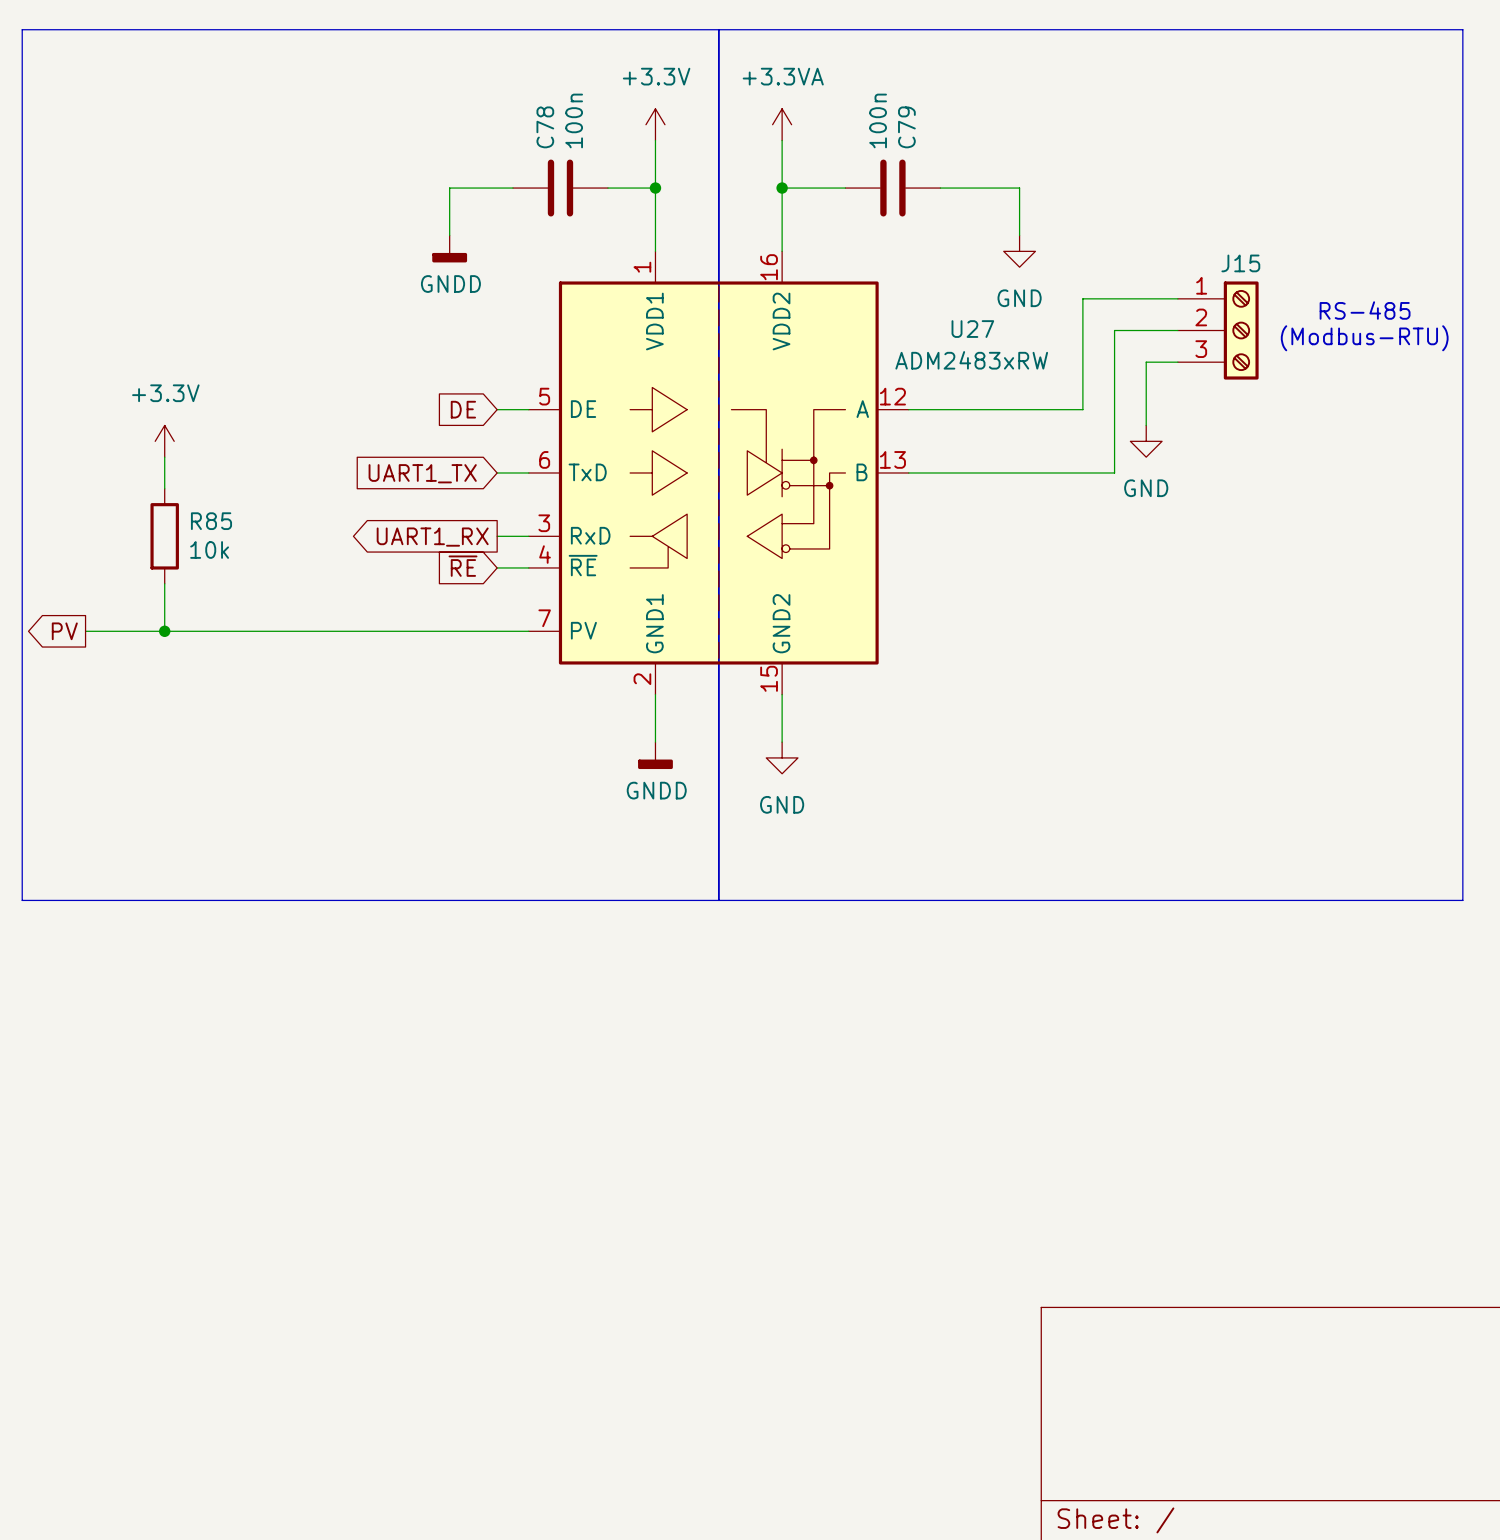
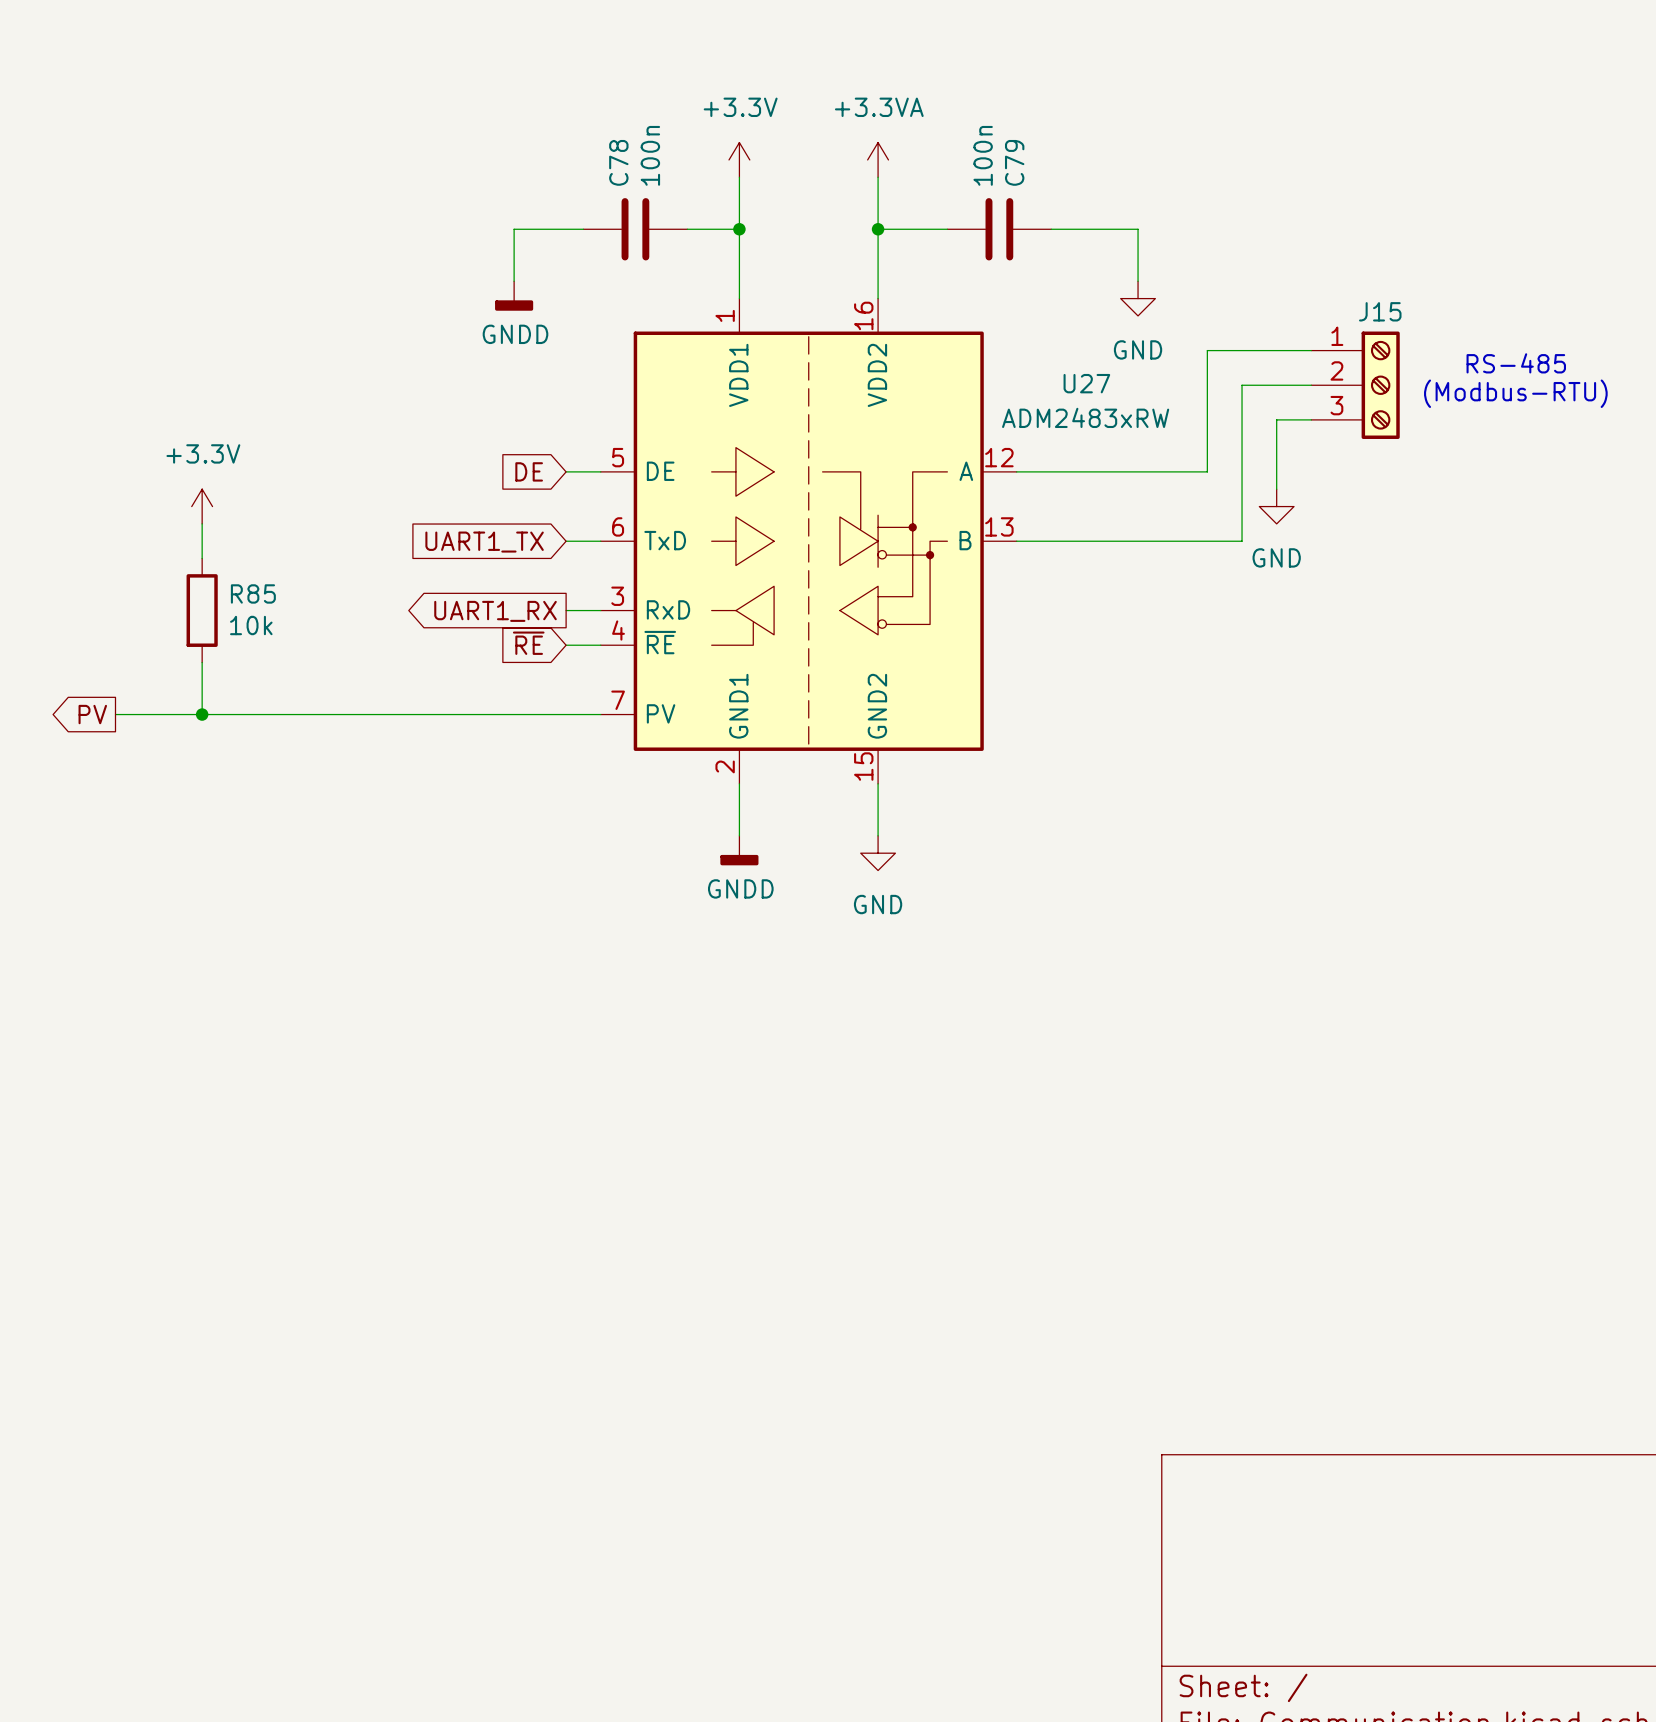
line: (22, 29) (1462, 29) (1462, 900) (22, 900) (22, 29) -> none
line: (718, 29) (718, 900) -> none

